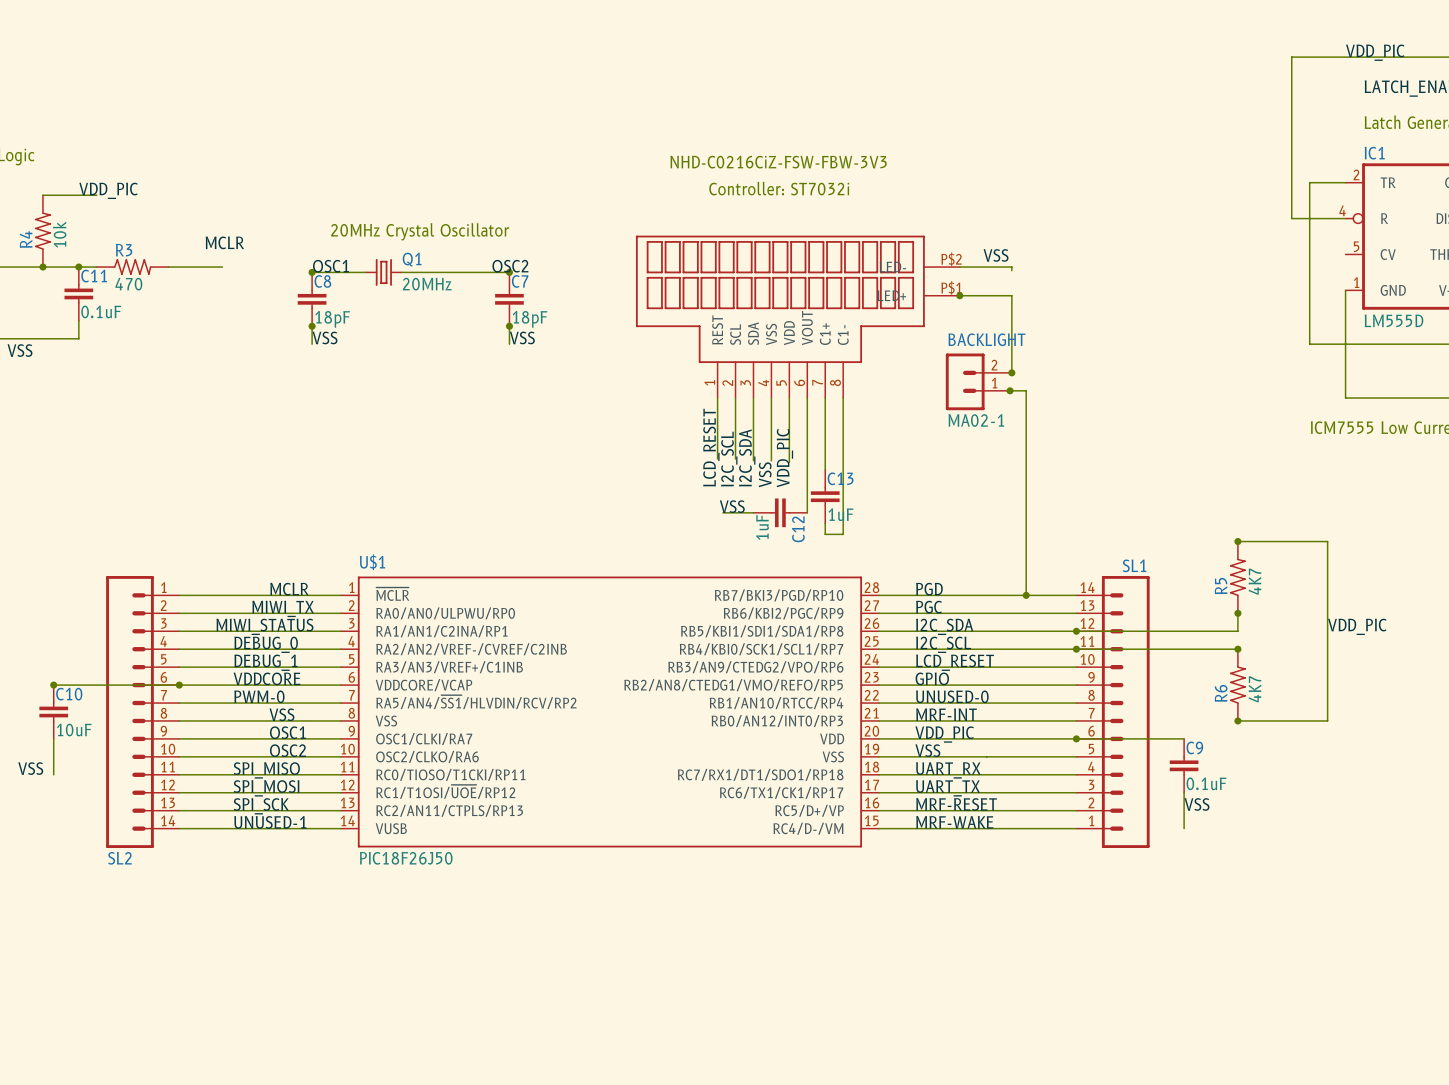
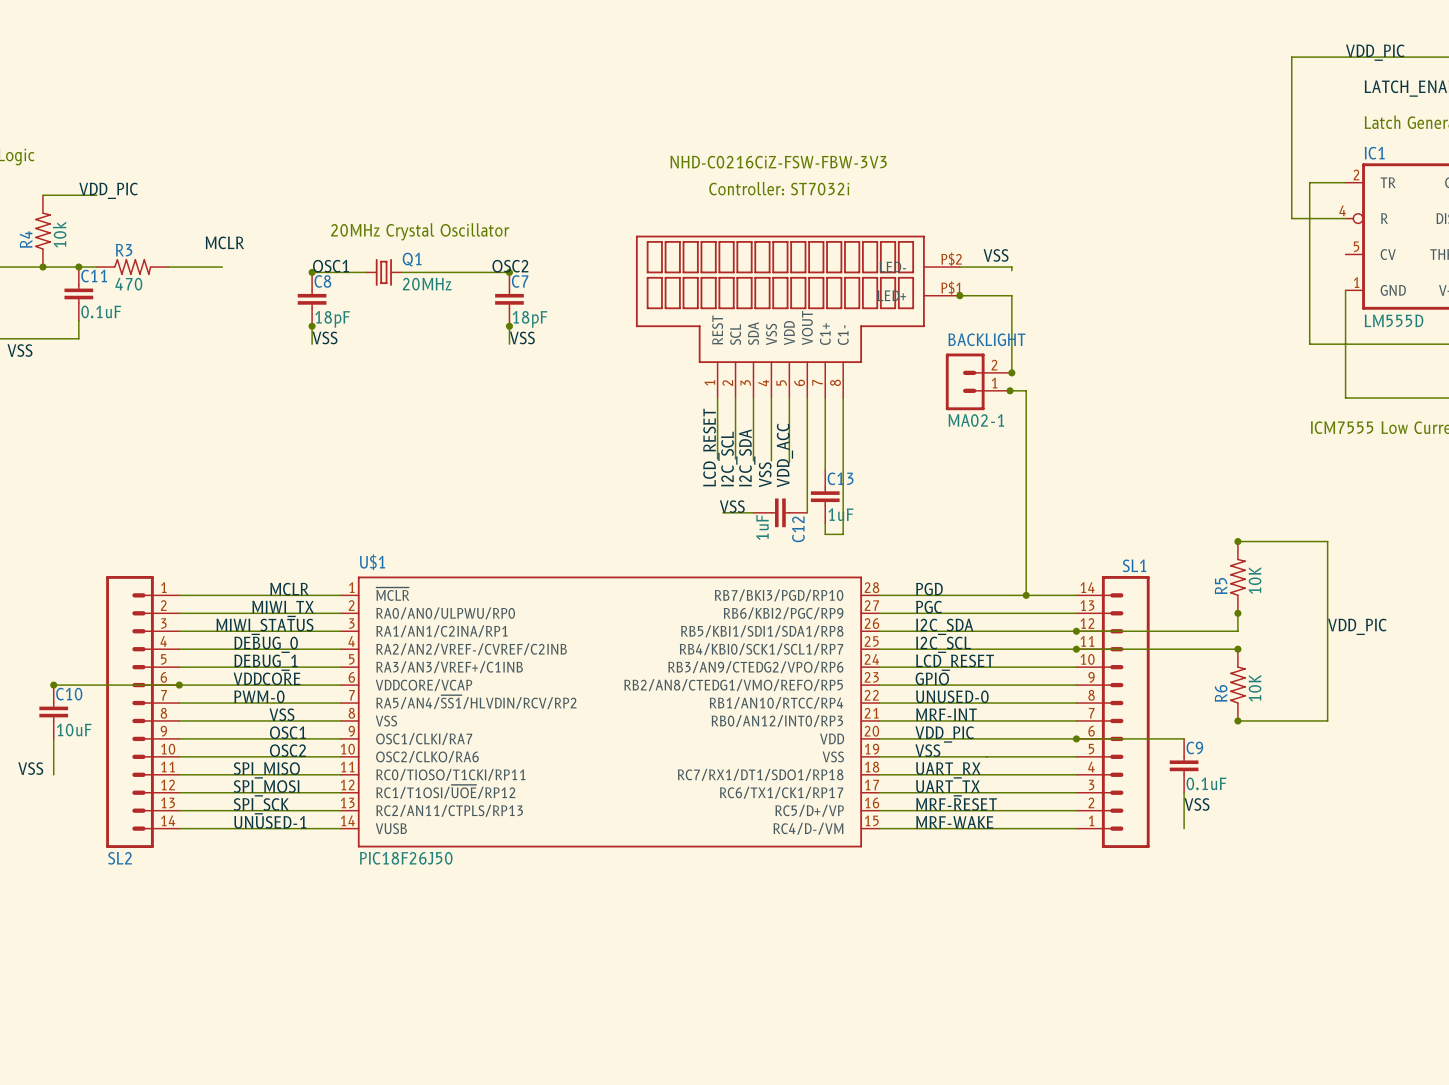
label: VDD_PIC (784, 458) -> VDD_ACC (784, 455)
R5 value: 4K7 (1254, 581) -> 10K (1255, 580)
R6 value: 4K7 (1254, 689) -> 10K (1255, 688)

